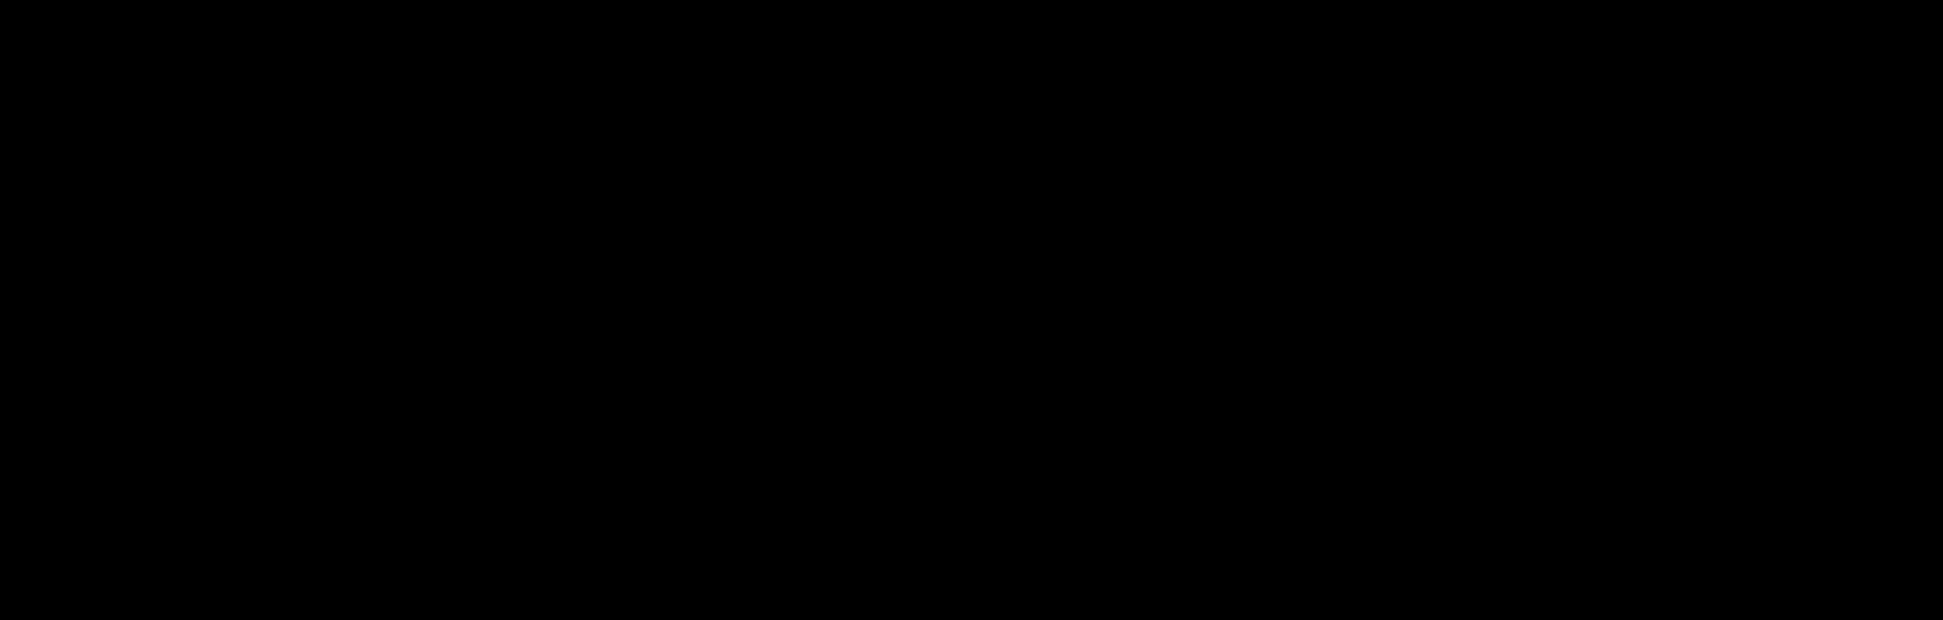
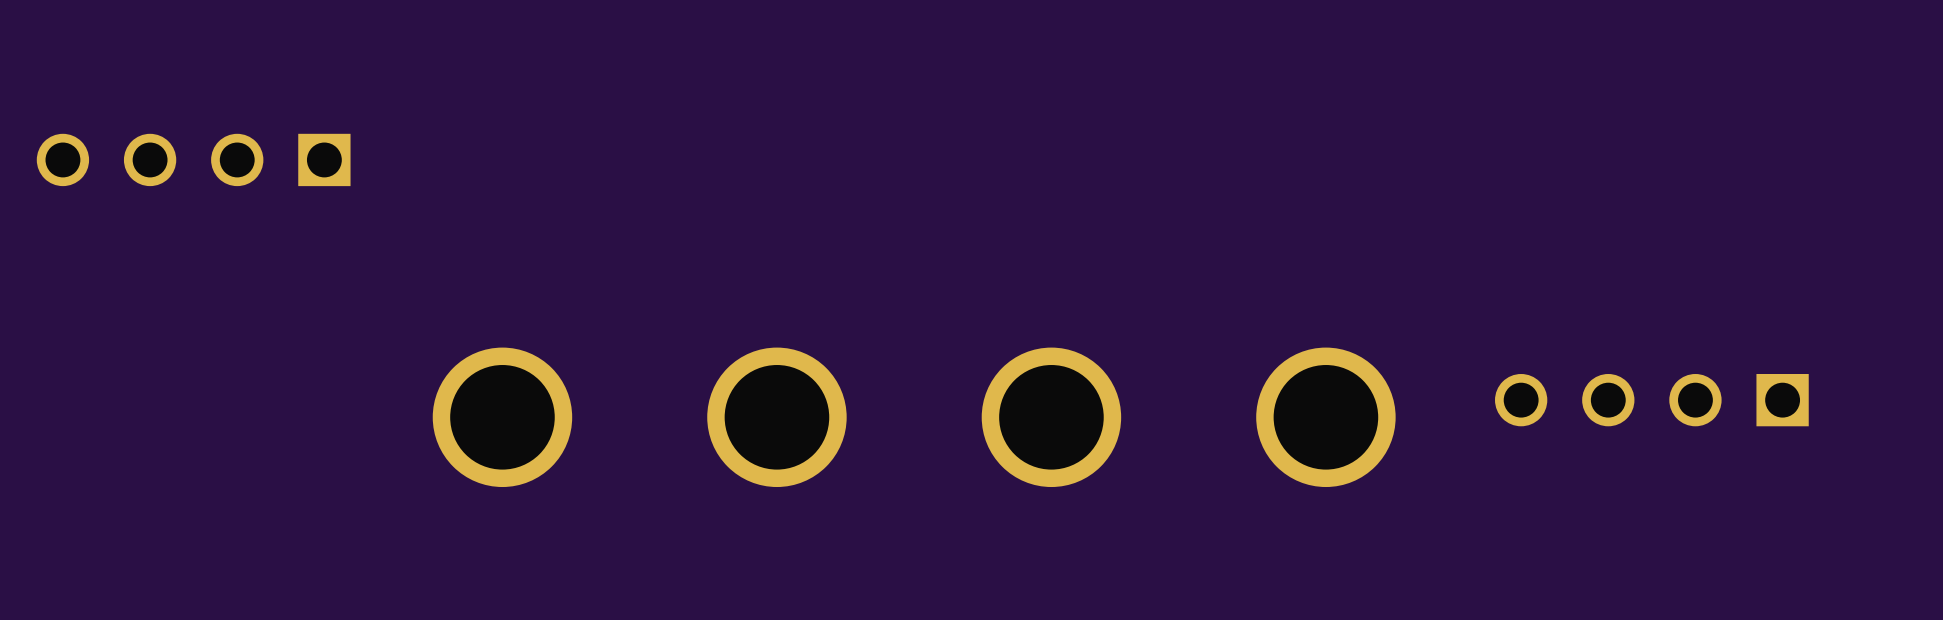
part: none -> (193, 159)
part: none -> (1651, 400)
part: none -> (502, 417)
part: none -> (776, 417)
part: none -> (1051, 417)
part: none -> (1325, 417)

